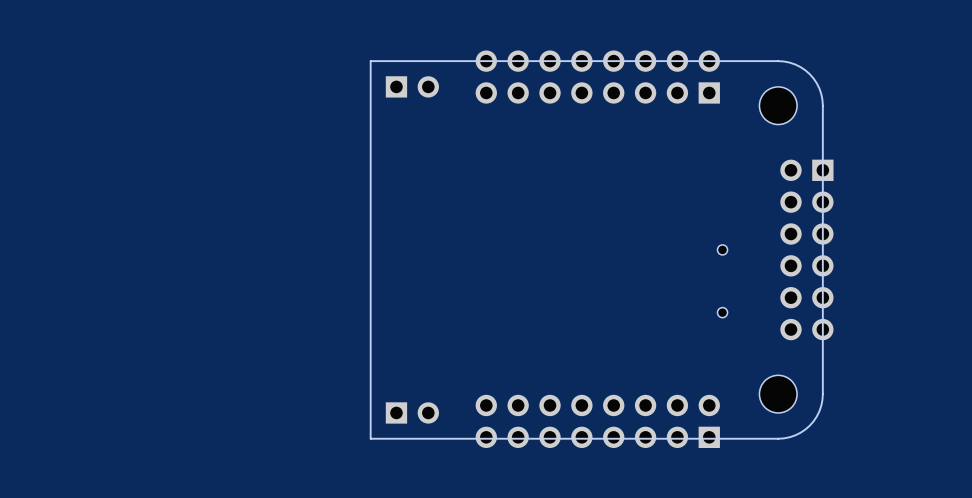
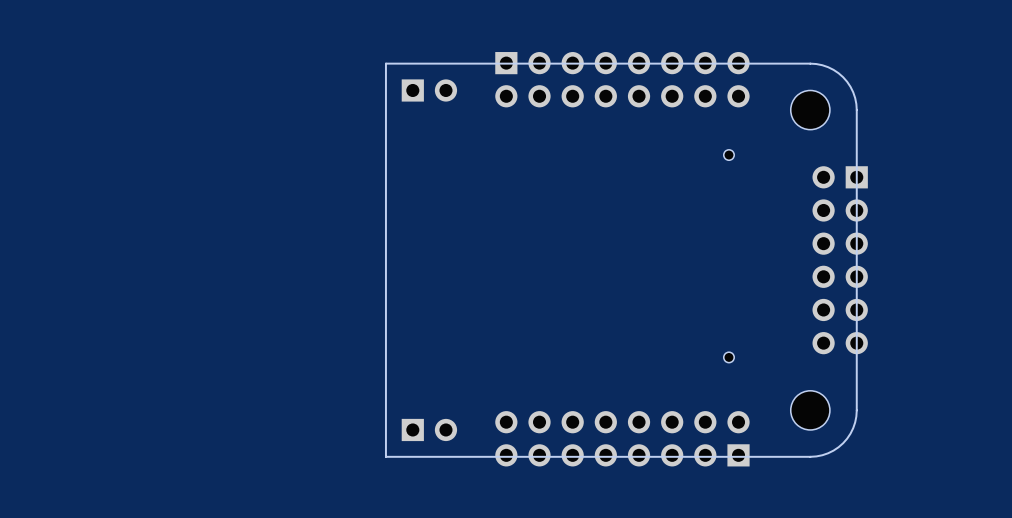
part rotation: 0° (597, 77) -> 180° (622, 79)
part: none -> (728, 155)
part: (722, 249) -> none
part position: (722, 312) -> (728, 357)

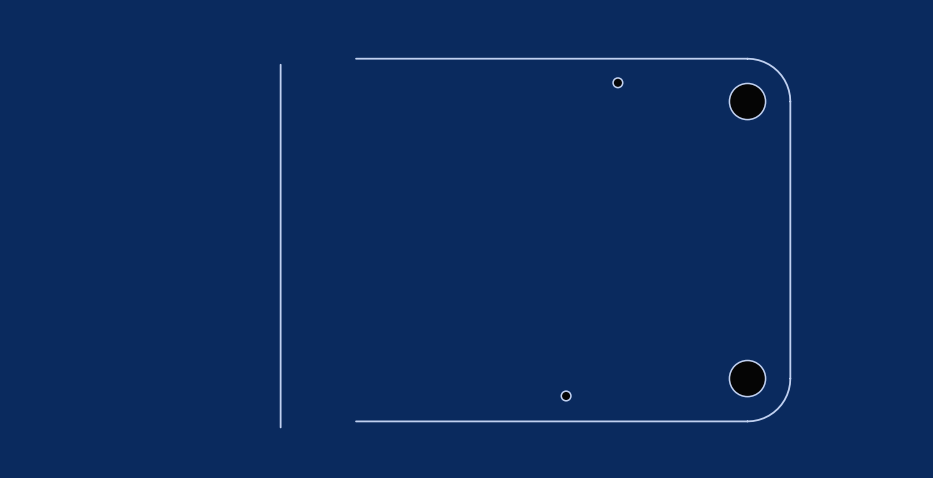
board edge: (385, 63) (385, 456) -> (280, 64) (280, 427)
part: (622, 79) -> none
part: (429, 90) -> none
part position: (728, 155) -> (617, 82)
part: (840, 260) -> none
part: (728, 357) -> none
part footprint: [495, 411, 750, 467] -> [561, 391, 571, 401]
part: (429, 429) -> none

